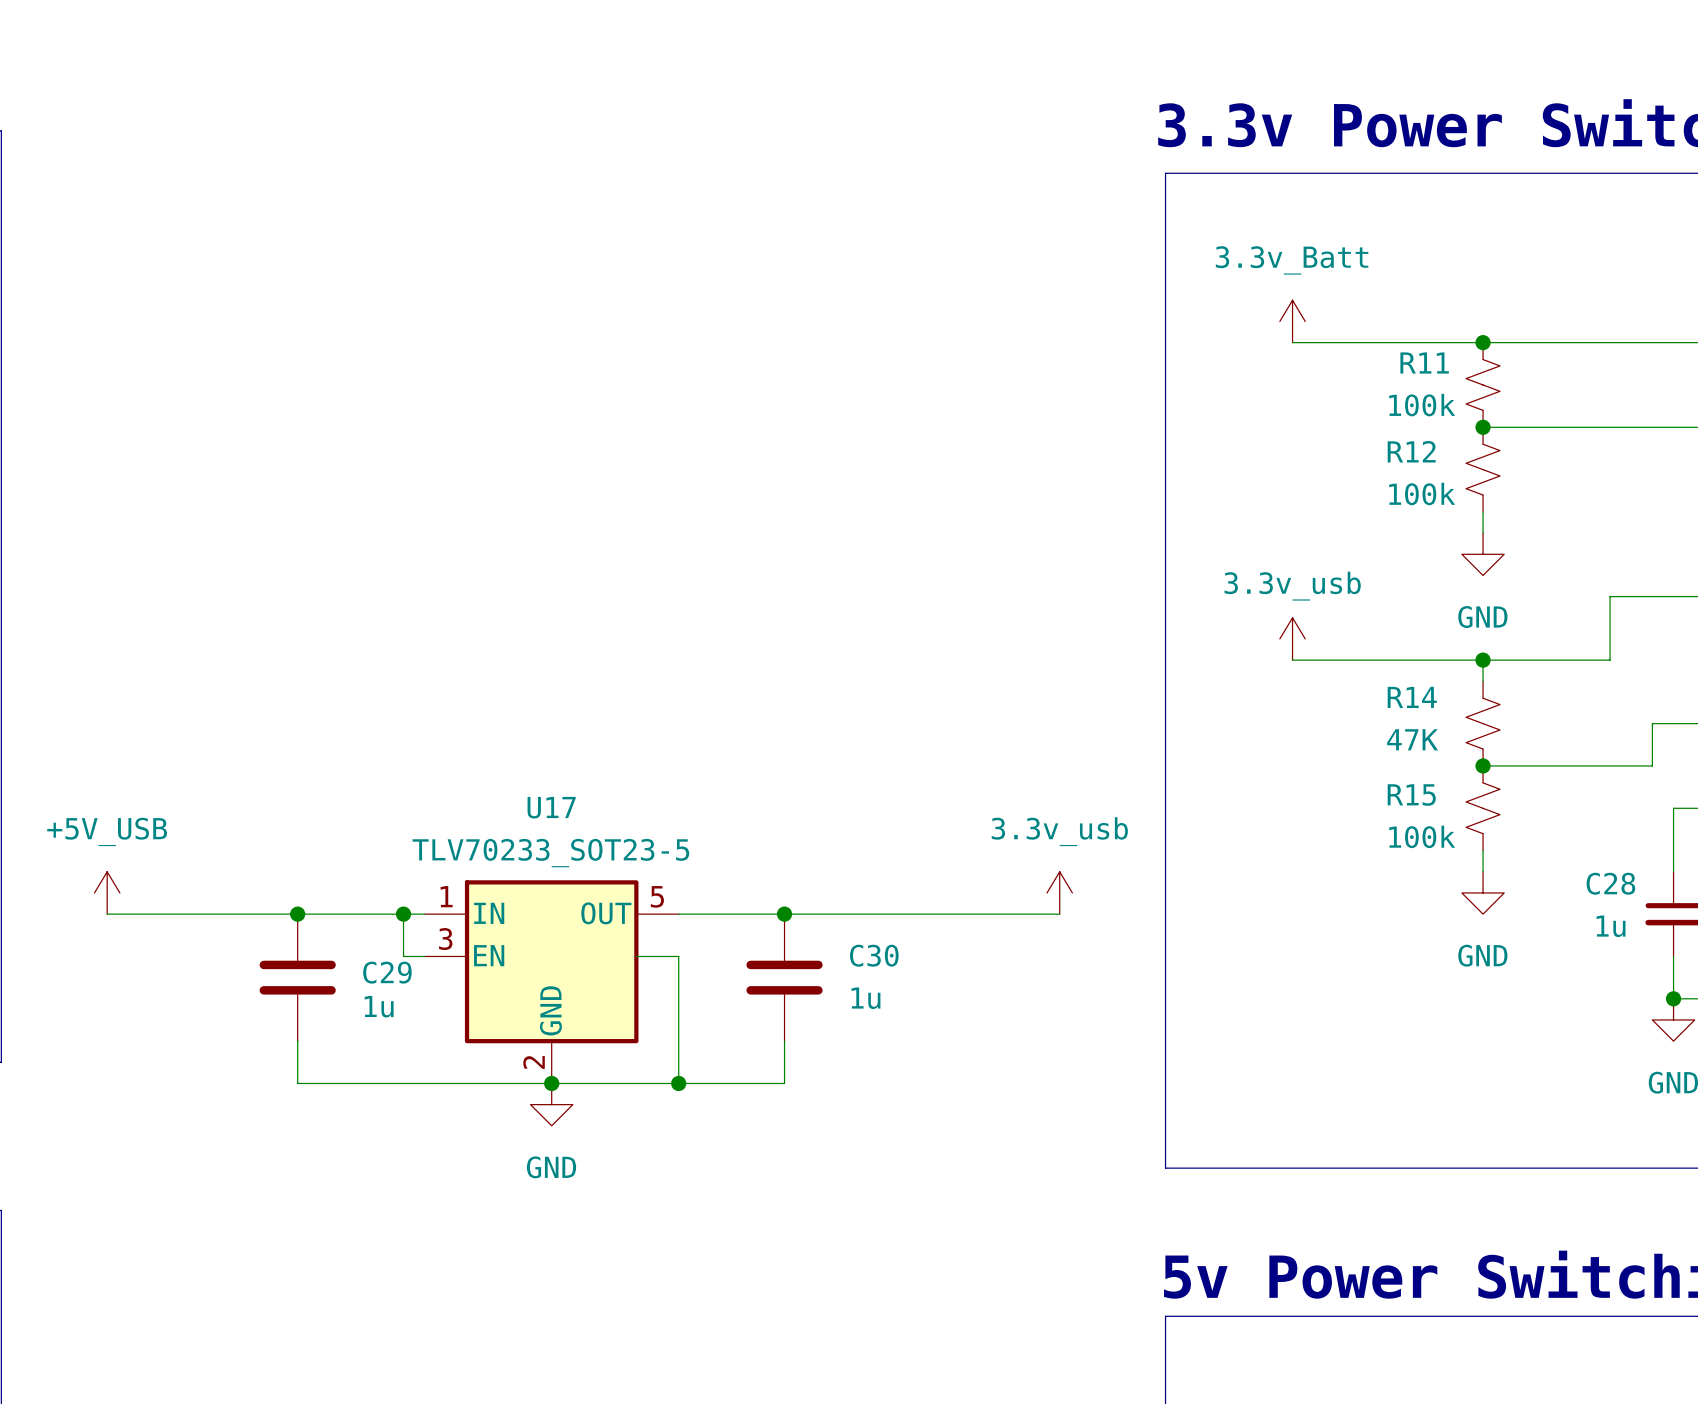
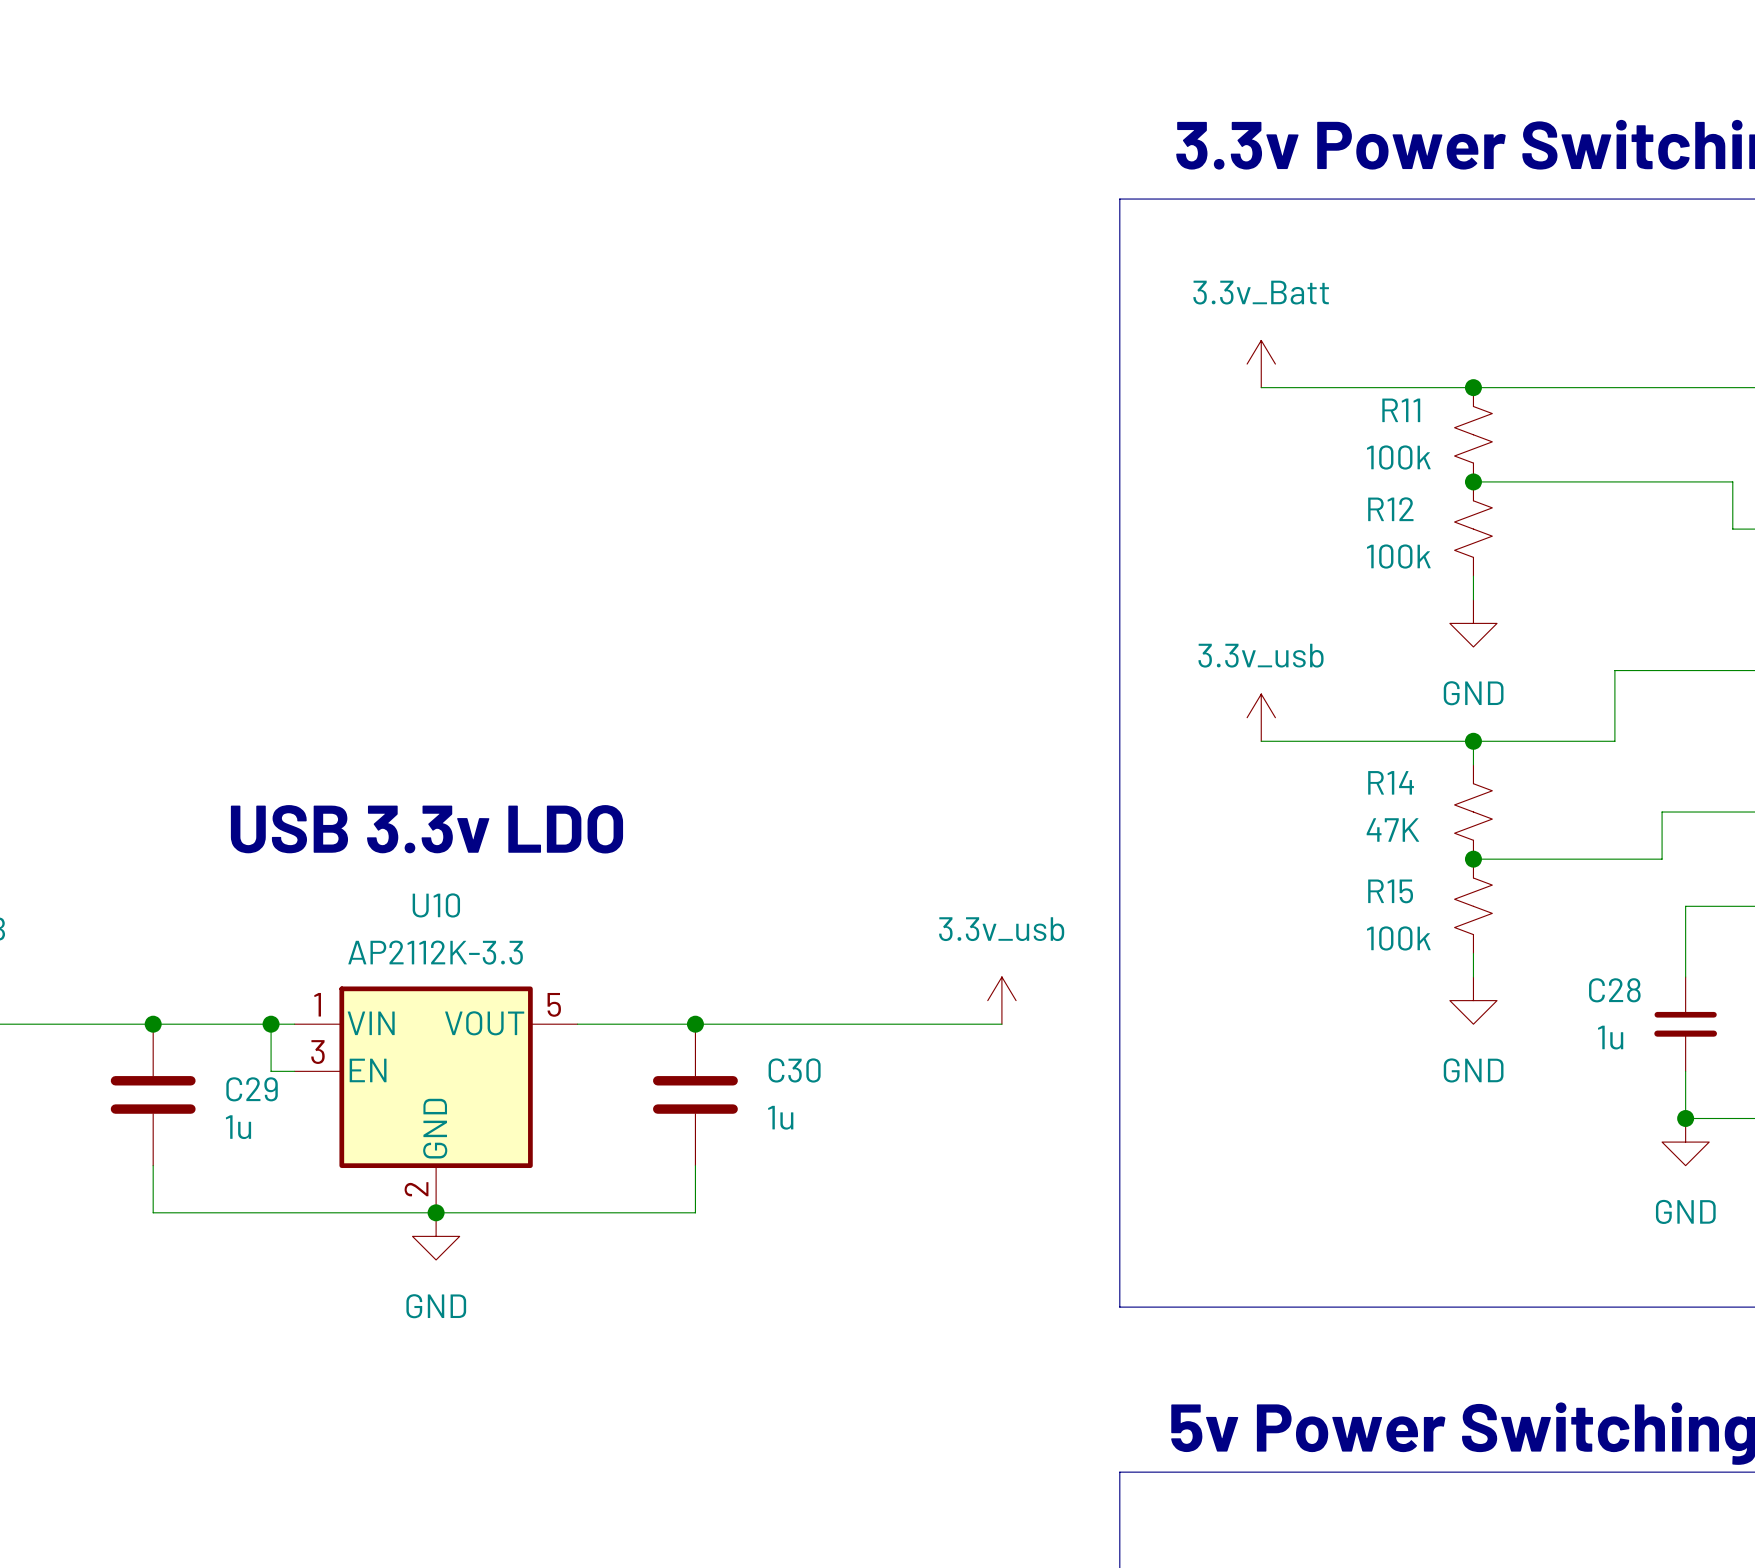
text: none -> USB 3.3v LDO (426, 829)
U17 name: U17 (551, 807) -> U10 (436, 905)
U17 value: TLV70233_SOT23-5 (550, 853) -> AP2112K-3.3 (435, 952)
U17 pin name: IN (489, 913) -> VIN (371, 1023)
U17 pin name: OUT (606, 913) -> VOUT (484, 1023)
wire: (636, 956) (678, 956) (678, 1083) -> none
junction: (678, 1083) -> none

